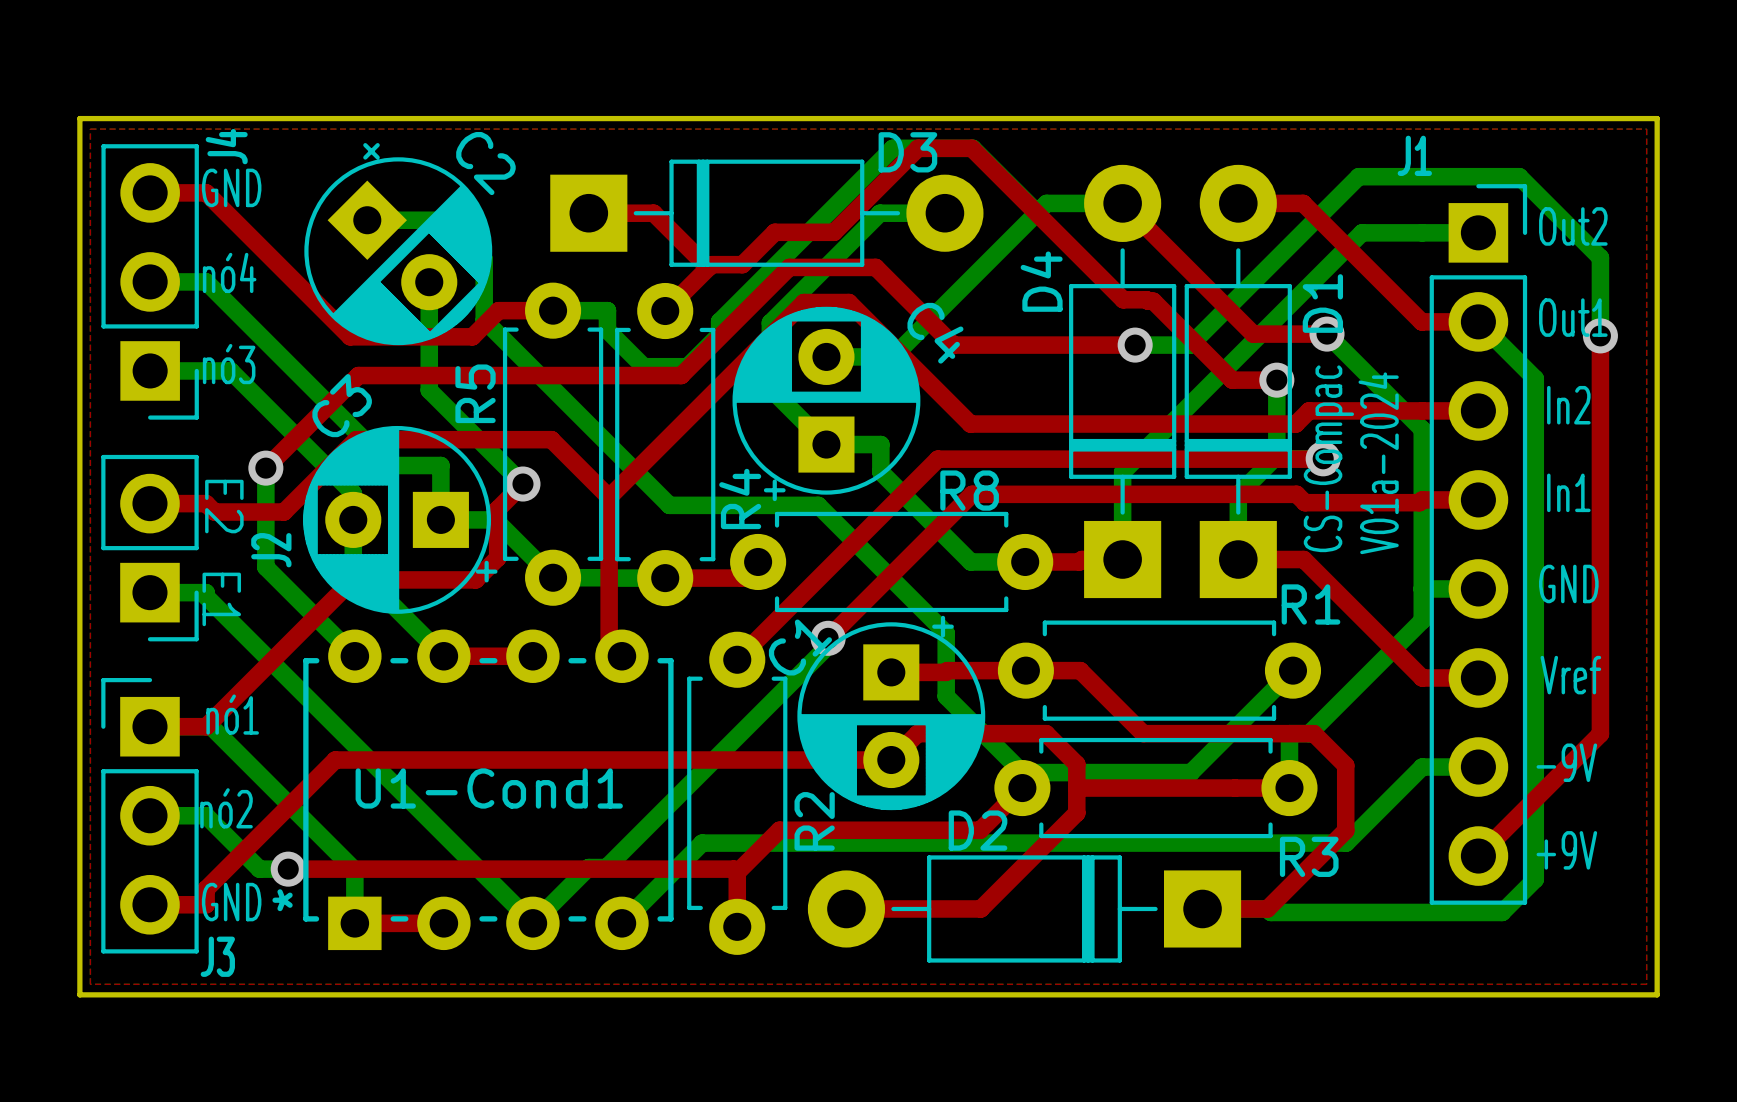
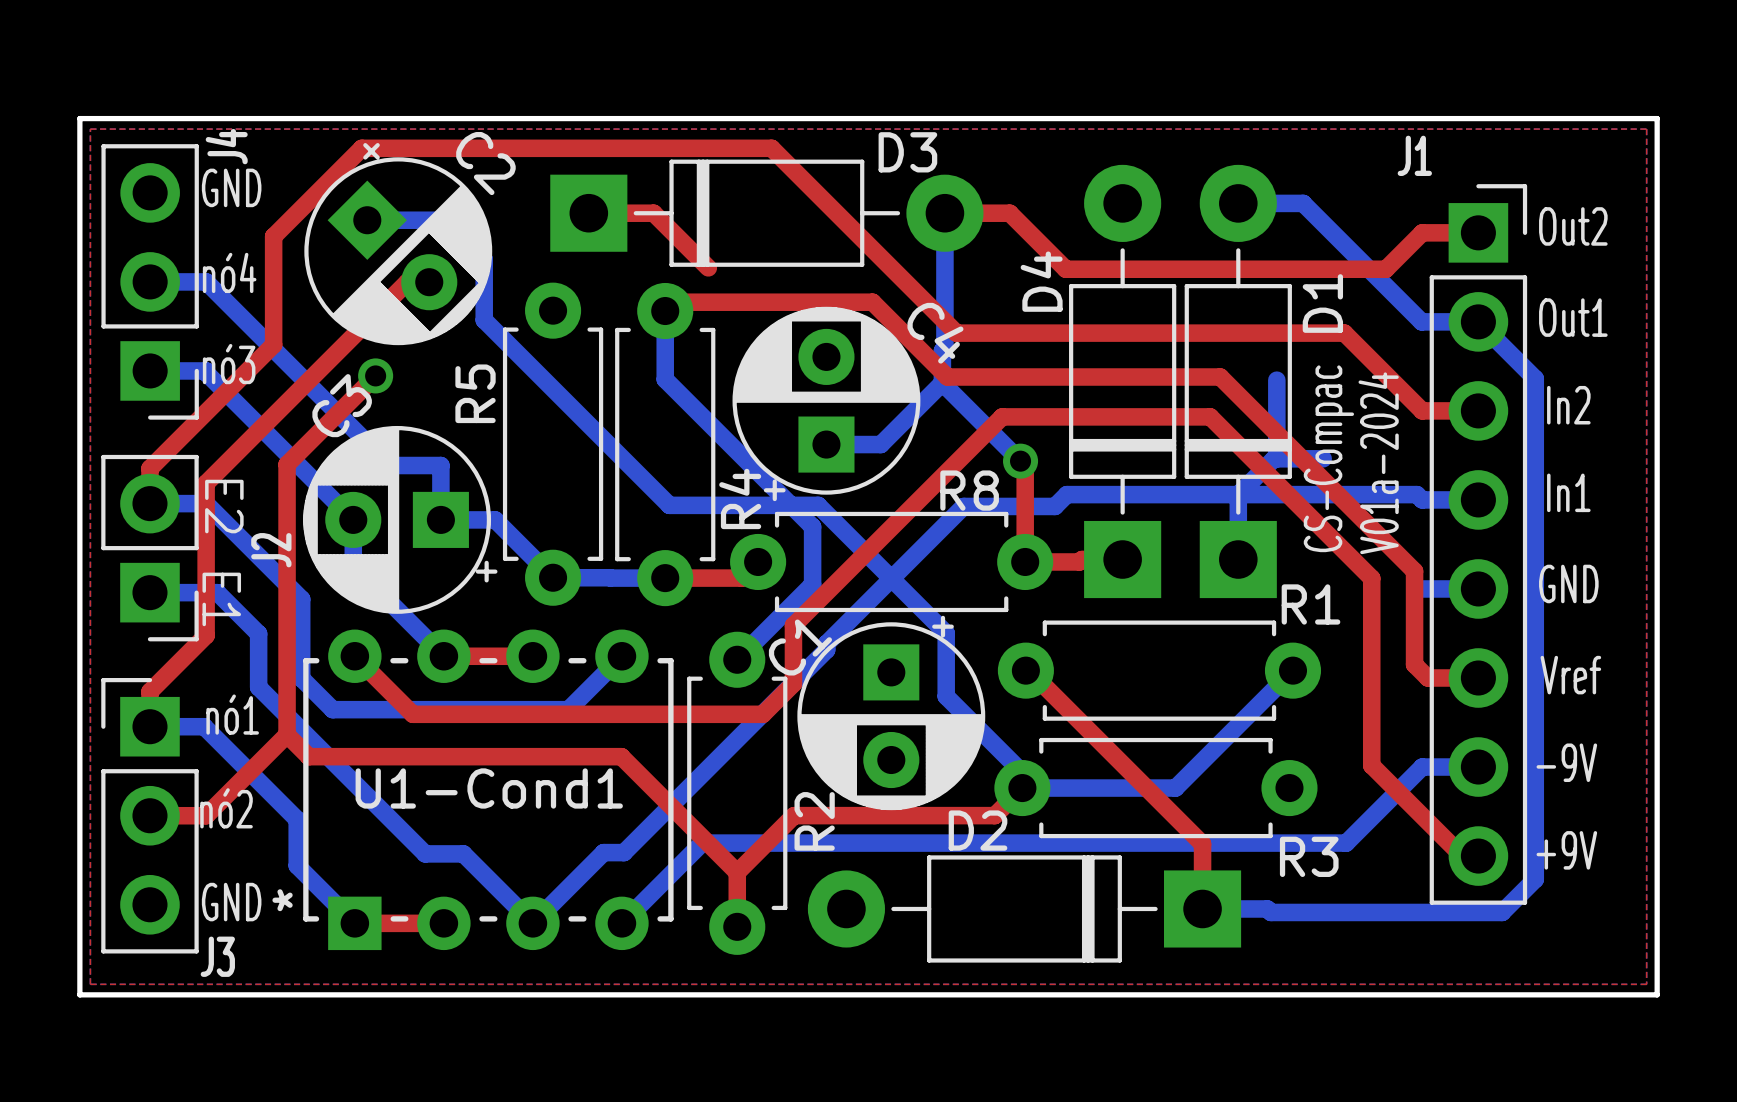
top track: (150, 192) (206, 192) (350, 336) (472, 336) (498, 310) (553, 310) -> none
top track: (1122, 203) (1253, 334) (1327, 334) -> none
bottom track: (1122, 203) (1046, 203) (893, 356) (826, 356) -> none
top track: (1238, 203) (1303, 203) (1421, 321) (1478, 321) -> none
bottom track: none -> (1238, 203) (1303, 203) (1421, 321) (1478, 321)
bottom track: (1037, 212) (972, 148) (892, 148) (719, 321) (719, 334) (687, 366) (643, 366) (607, 330) (607, 310) (553, 310) -> none
top track: none -> (944, 213) (1009, 213) (1065, 269) (1385, 269) (1422, 232) (1478, 232)
bottom track: (944, 213) (880, 213) (770, 322) (770, 388) (826, 444) -> (944, 213) (944, 348) (942, 350) (942, 383)
bottom track: (1478, 232) (1362, 232) (1122, 472) (1122, 559) -> none
bottom track: (429, 282) (429, 390) (522, 484) -> none
top track: (669, 306) (711, 264) (742, 264) (774, 232) (834, 232) (918, 148) (971, 148) (1123, 299) (1153, 301) (1232, 380) (1276, 380) -> none
bottom track: none -> (665, 311) (665, 379) (812, 526) (812, 584) (737, 659)
bottom track: (1327, 334) (1422, 429) (1422, 620) (1309, 733) (1289, 733) (1289, 788) -> none
via: (1327, 334) -> none
top track: (1600, 335) (1600, 734) (1478, 856) -> (354, 656) (412, 714) (762, 714) (793, 683) (793, 625) (1002, 416) (1210, 416) (1371, 578) (1371, 765) (1462, 856) (1478, 856)
bottom track: (1600, 335) (1600, 257) (1519, 176) (1358, 176) (1190, 345) (1135, 345) -> none
via: (1600, 335) -> none
top track: (1135, 345) (953, 345) (875, 267) (789, 267) (681, 375) (358, 375) (265, 468) -> none
via: (1135, 345) -> none
bottom track: (206, 370) (230, 370) (353, 493) (353, 519) -> (206, 370) (353, 519)
top track: none -> (375, 375) (287, 464) (287, 734)
via: none -> (375, 375)
via: (1276, 380) -> none
bottom track: none -> (942, 383) (1020, 461)
top track: (1422, 410) (1309, 410) (1295, 424) (970, 424) (848, 302) (803, 302) (609, 497) -> (1422, 410) (1344, 333) (956, 333) (771, 148) (361, 148) (273, 236) (273, 344) (149, 468) (149, 503)
bottom track: (880, 444) (880, 472) (970, 561) (1025, 561) -> (880, 444) (942, 383)
via: (1323, 458) -> none
top track: (1322, 459) (937, 459) (737, 659) -> none
top track: none -> (1020, 461) (1025, 465) (1025, 561)
via: none -> (1020, 461)
bottom track: (265, 468) (265, 567) (354, 656) -> none
via: (265, 468) -> none
top track: (522, 484) (497, 509) (497, 558) (475, 579) (352, 579) (206, 726) (149, 726) -> (429, 282) (407, 282) (206, 483) (206, 635) (149, 691) (149, 726)
via: (522, 484) -> none
top track: (609, 497) (551, 439) (356, 439) (284, 512) (214, 512) (206, 503) (149, 503) -> none
top track: (609, 497) (609, 643) (621, 656) -> none
top track: (1478, 499) (1422, 499) (1419, 502) (1305, 502) (1296, 494) (972, 494) (828, 638) -> none
bottom track: none -> (149, 503) (206, 503) (301, 599) (301, 678) (332, 709) (568, 709) (621, 656)
top track: (1238, 559) (1303, 559) (1422, 677) (1427, 677) -> (669, 302) (872, 302) (947, 377) (1220, 377) (1414, 571) (1414, 664) (1427, 677)
bottom track: (206, 592) (206, 596) (463, 853) -> (206, 592) (217, 592) (258, 633) (258, 687) (425, 853) (463, 853)
bottom track: (828, 638) (828, 645) (606, 867) (588, 867) -> (1478, 499) (1422, 499) (1416, 494) (1066, 494) (1055, 506) (963, 506) (826, 643) (826, 649) (623, 852) (603, 852) (588, 867)
via: (828, 638) -> none
top track: (1025, 670) (891, 672) -> none
top track: (1029, 670) (1080, 670) (1143, 733) (1313, 733) (1345, 765) (1345, 830) (1267, 908) (1202, 908) -> (1029, 670) (1202, 844) (1202, 908)
bottom track: (204, 726) (211, 726) (354, 870) (354, 923) -> (204, 726) (297, 819) (297, 865) (354, 923)
top track: none -> (287, 734) (206, 815) (149, 815)
bottom track: (1191, 772) (1022, 772) (1022, 788) -> (1191, 772) (1175, 788) (1022, 788)
top track: (1076, 788) (1289, 788) -> none
bottom track: (149, 815) (206, 815) (259, 869) (288, 869) -> none
top track: (994, 815) (980, 830) (779, 830) -> (994, 815) (794, 815) (779, 830)
top track: (288, 869) (733, 869) -> (287, 734) (308, 756) (621, 756) (733, 869)
via: (288, 869) -> none
top track: (149, 904) (206, 904) (206, 889) (335, 760) (891, 760) (917, 733) (1046, 733) (1076, 764) (1076, 813) (980, 908) (846, 908) -> none

